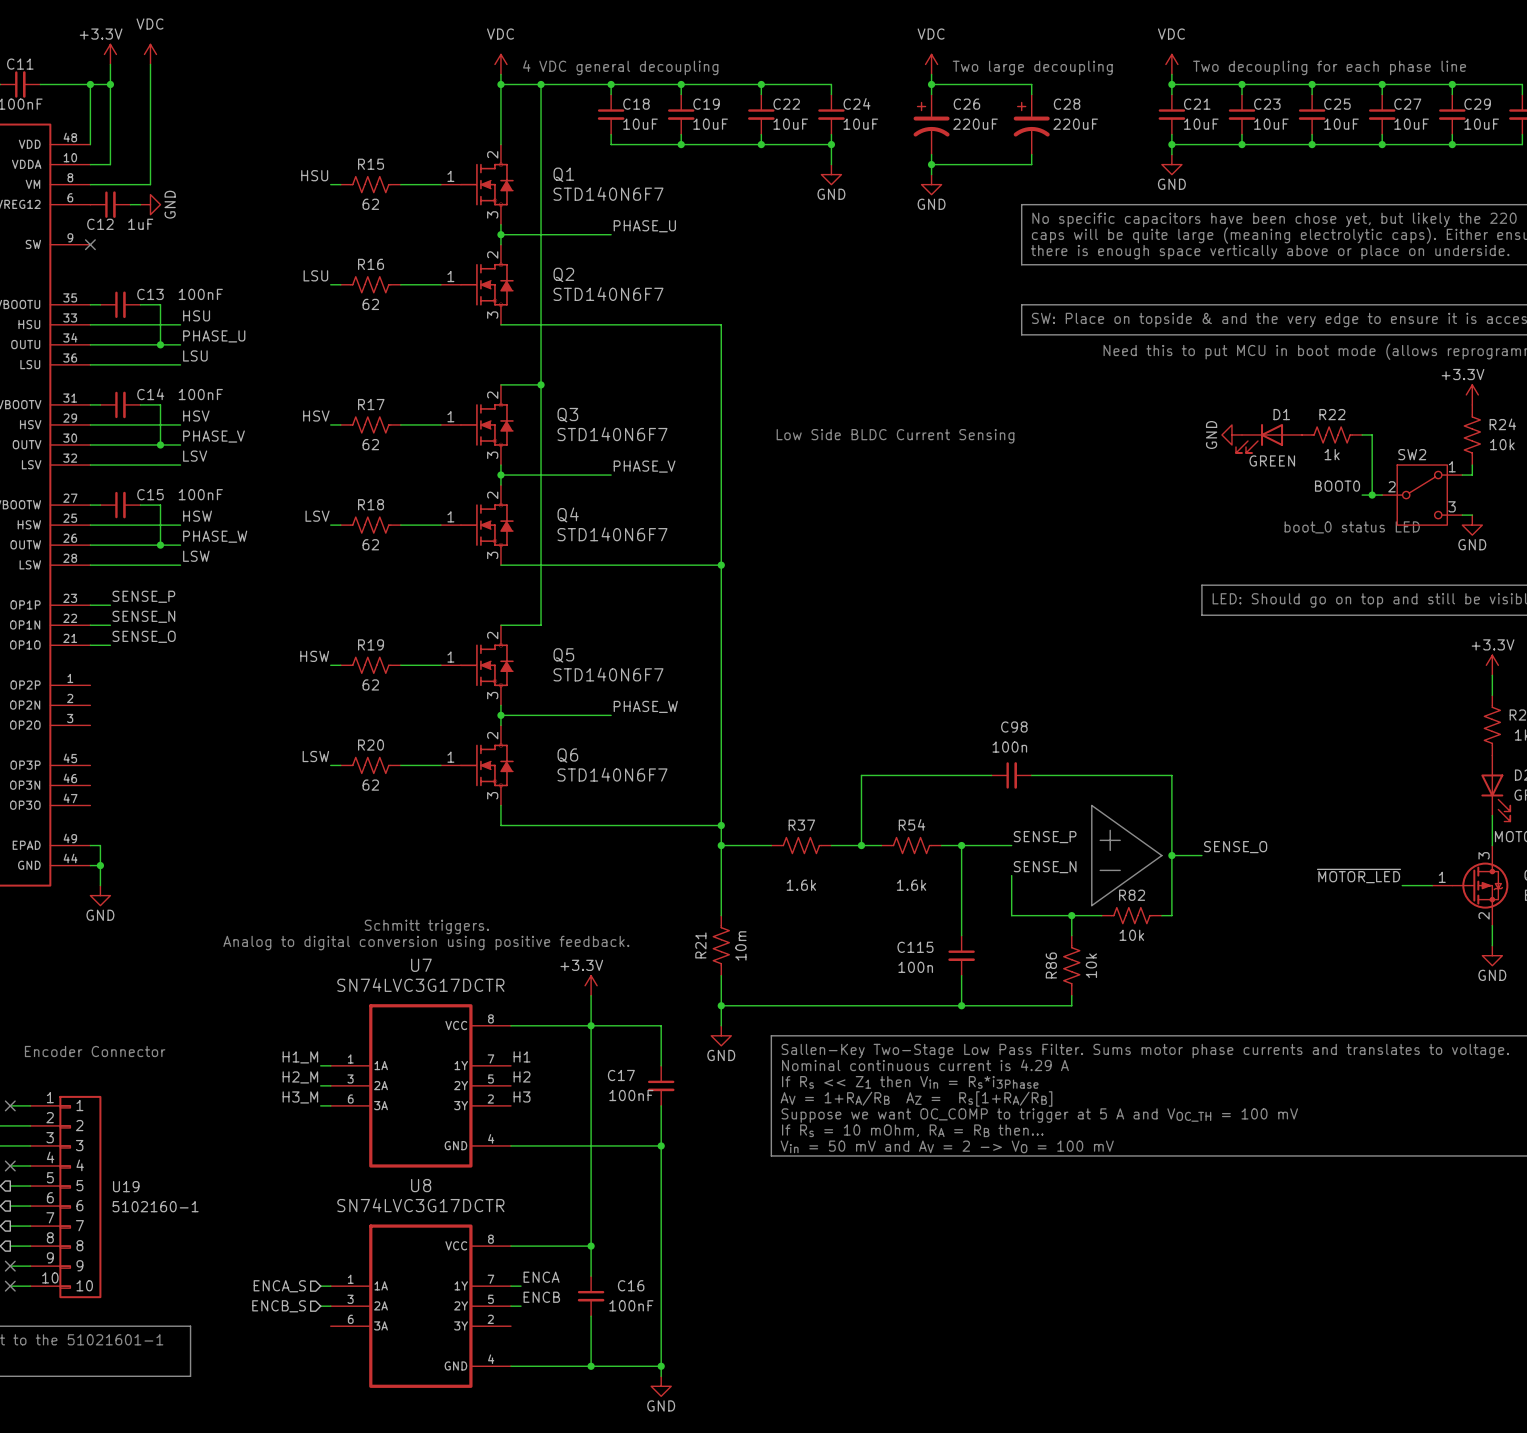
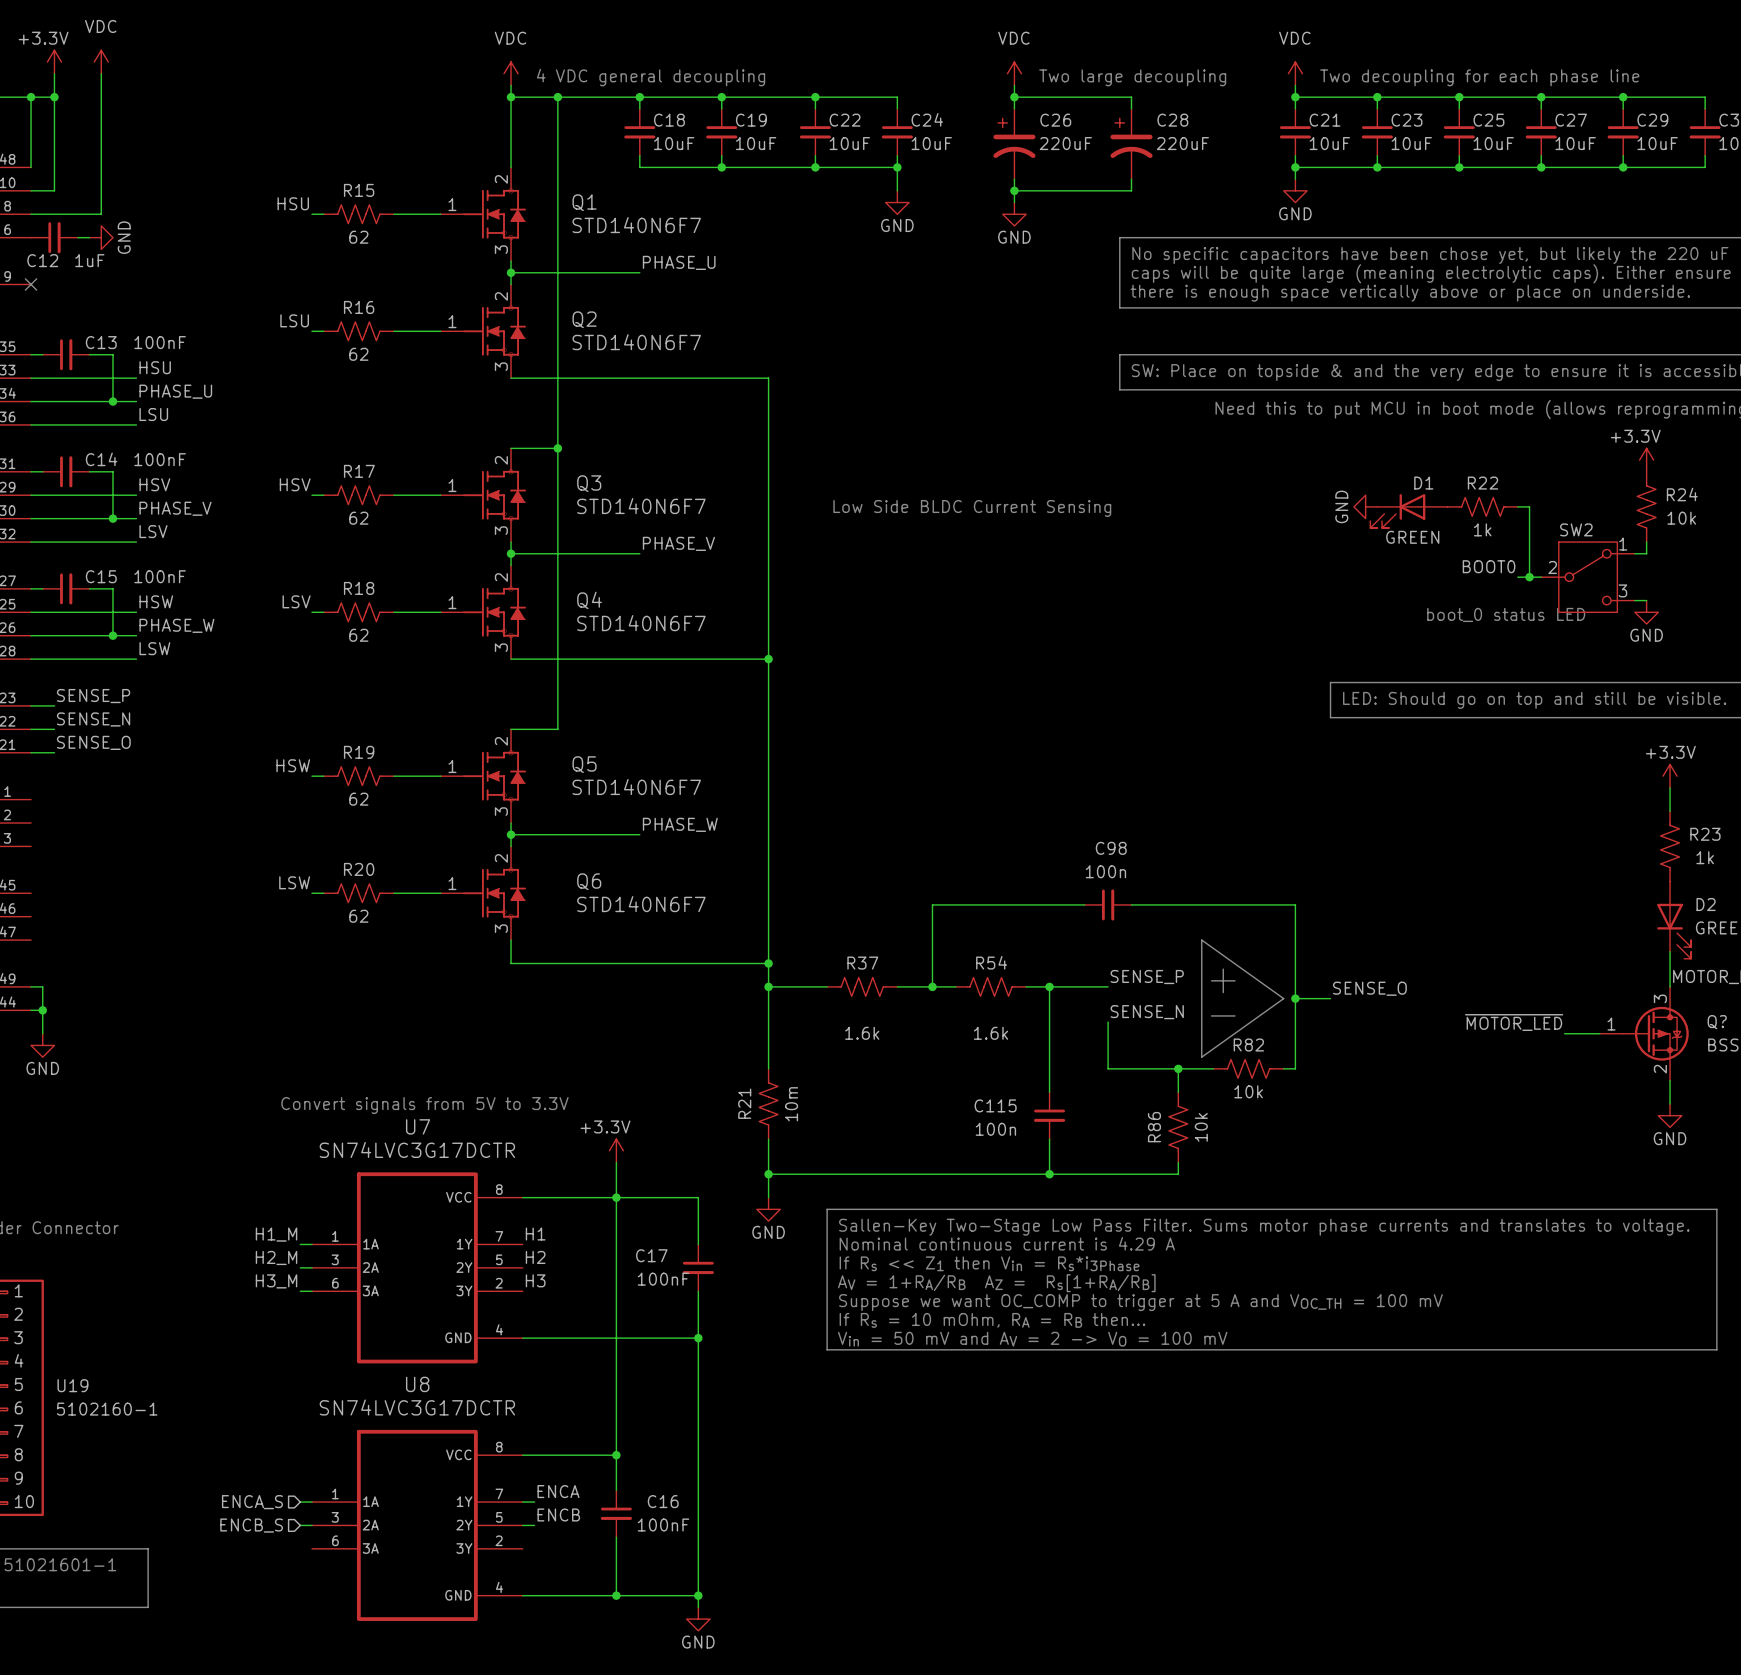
text: Schmitt triggers. (426, 926) -> none
text: Analog to digital conversion using positive feedback. (426, 943) -> Convert signals from 5V to 3.3V (424, 1105)

